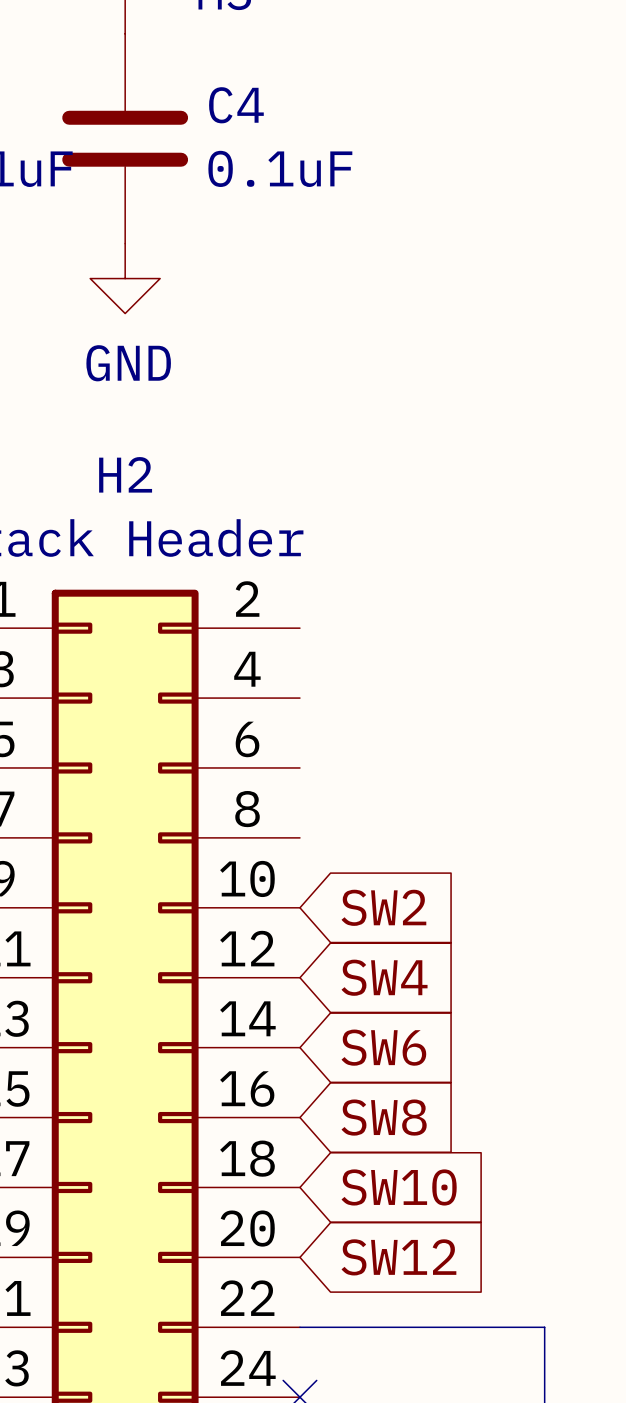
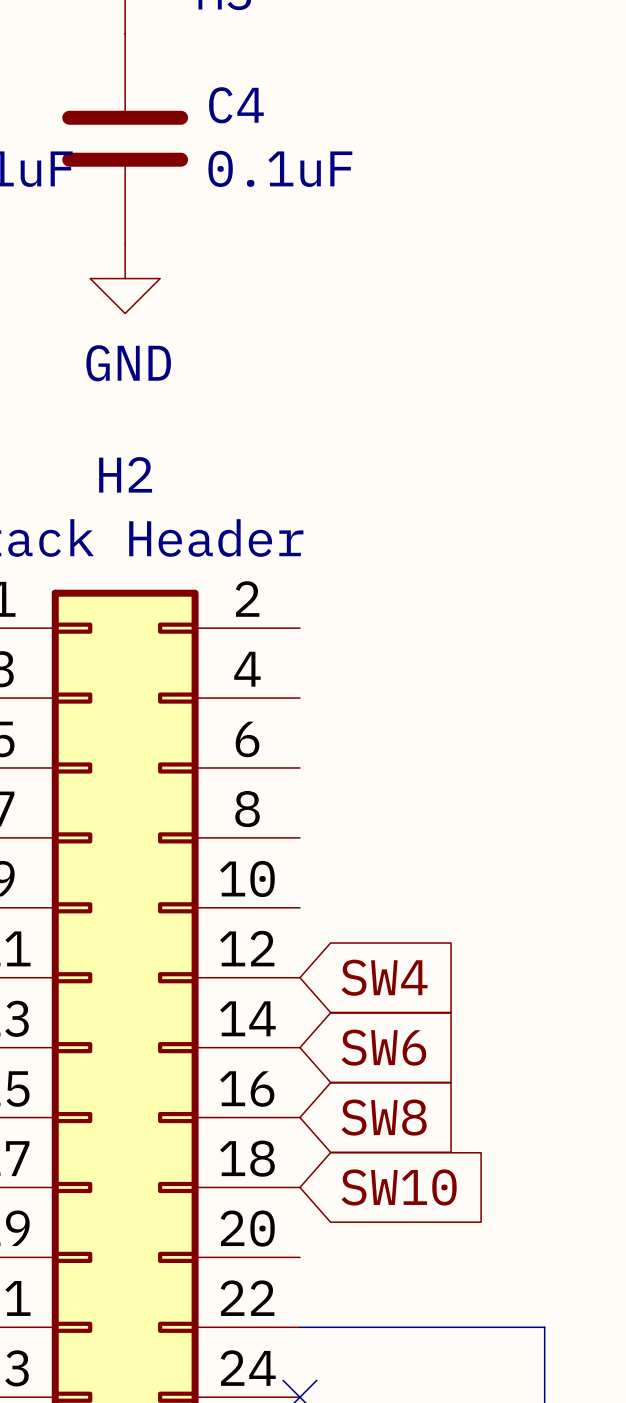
global label: SW2 (383, 907) -> none
global label: SW12 (398, 1257) -> none

